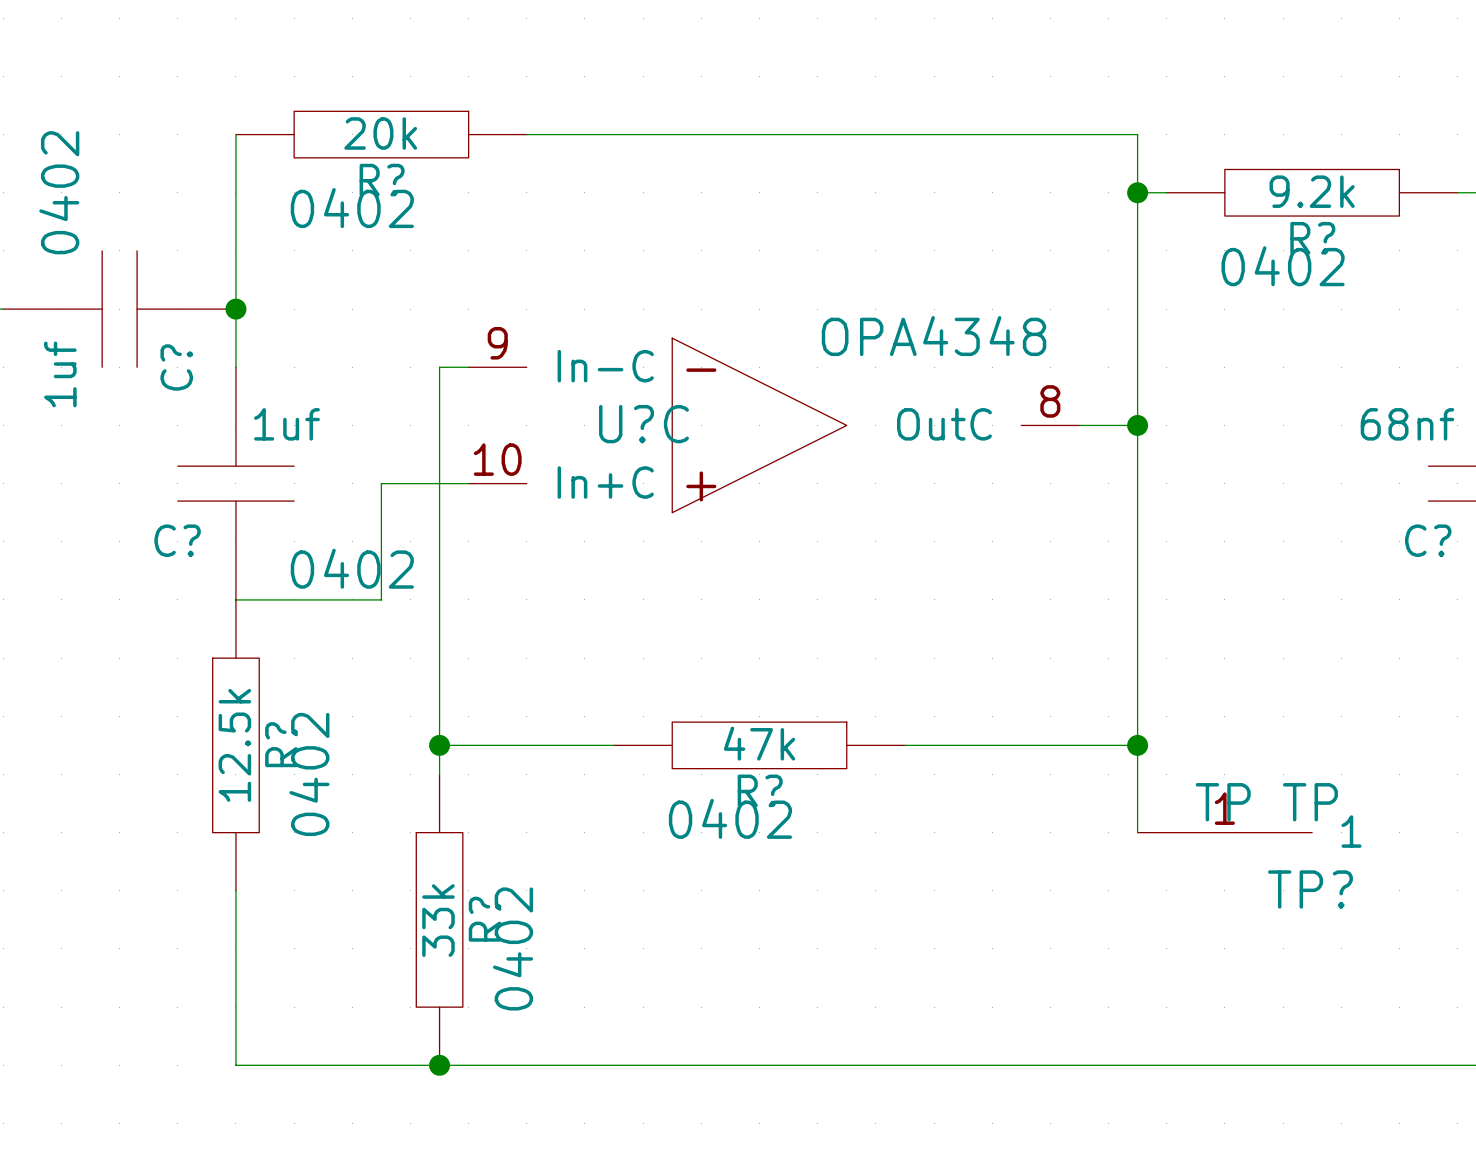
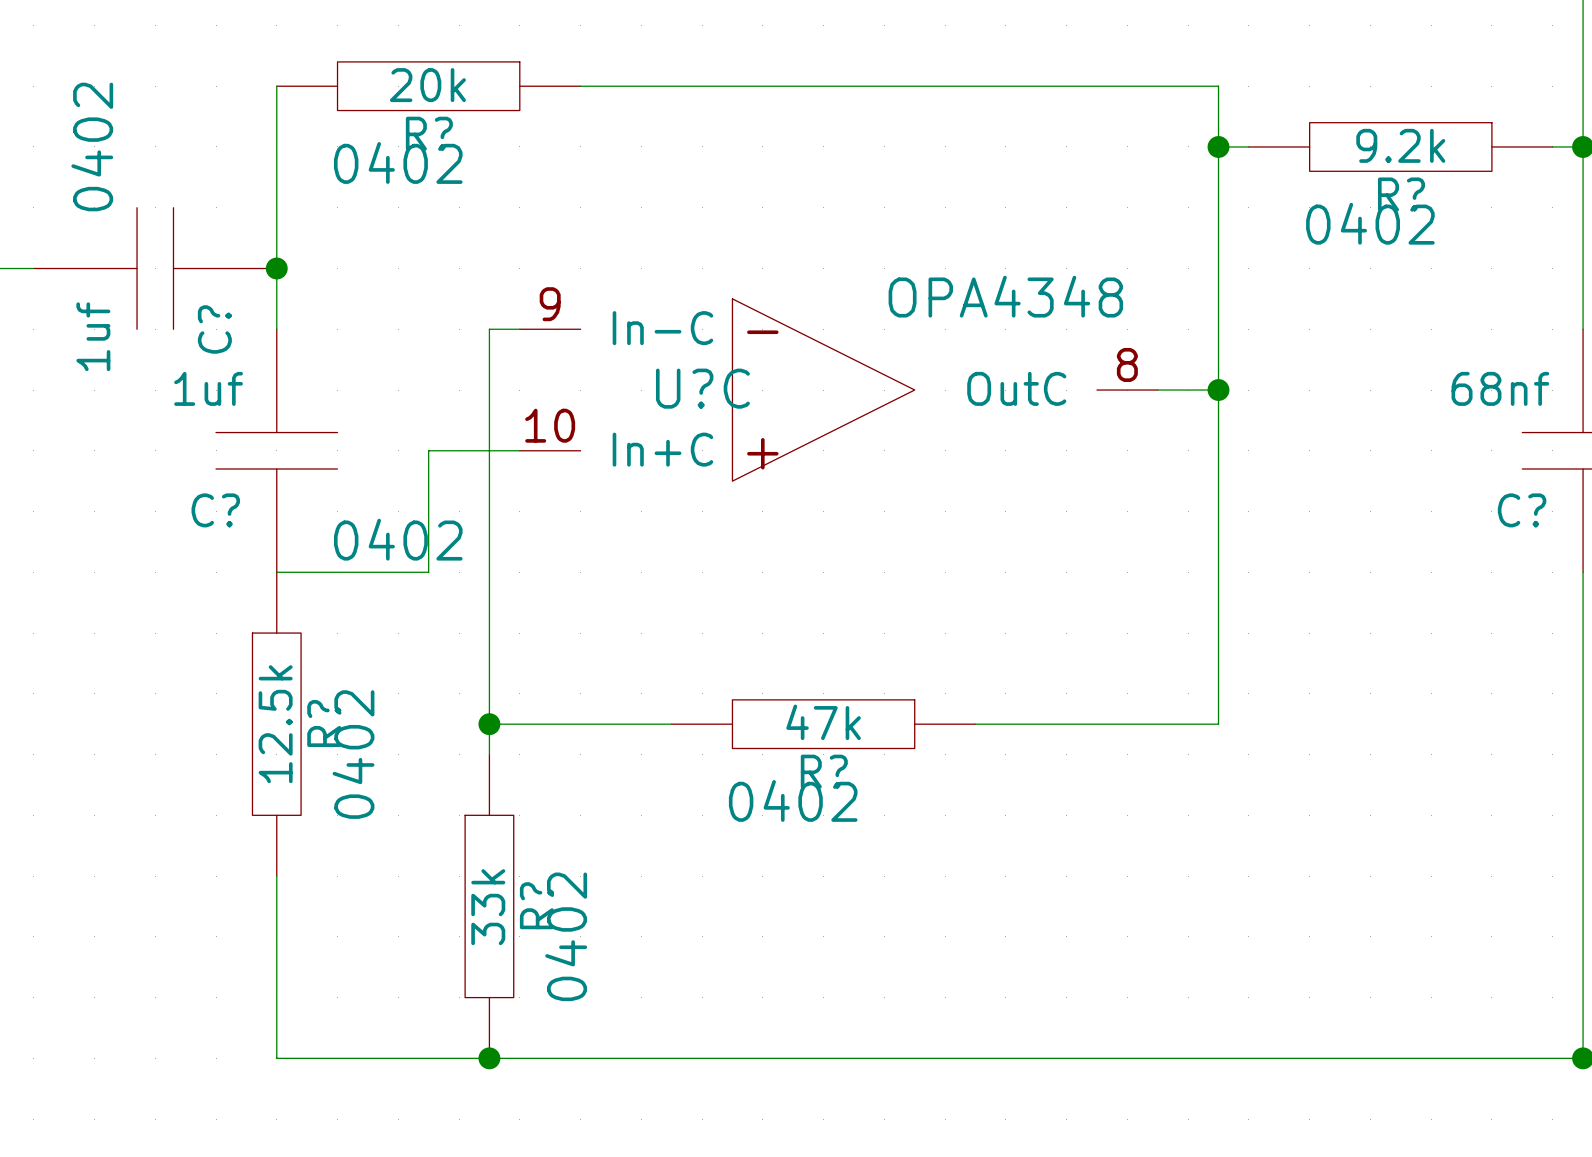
C? value position: 1uf (286, 424) -> 1uf (208, 388)
wire: (1137, 745) (1137, 832) -> none
junction: (1137, 745) -> none
TP?: TP (1224, 832) -> none

